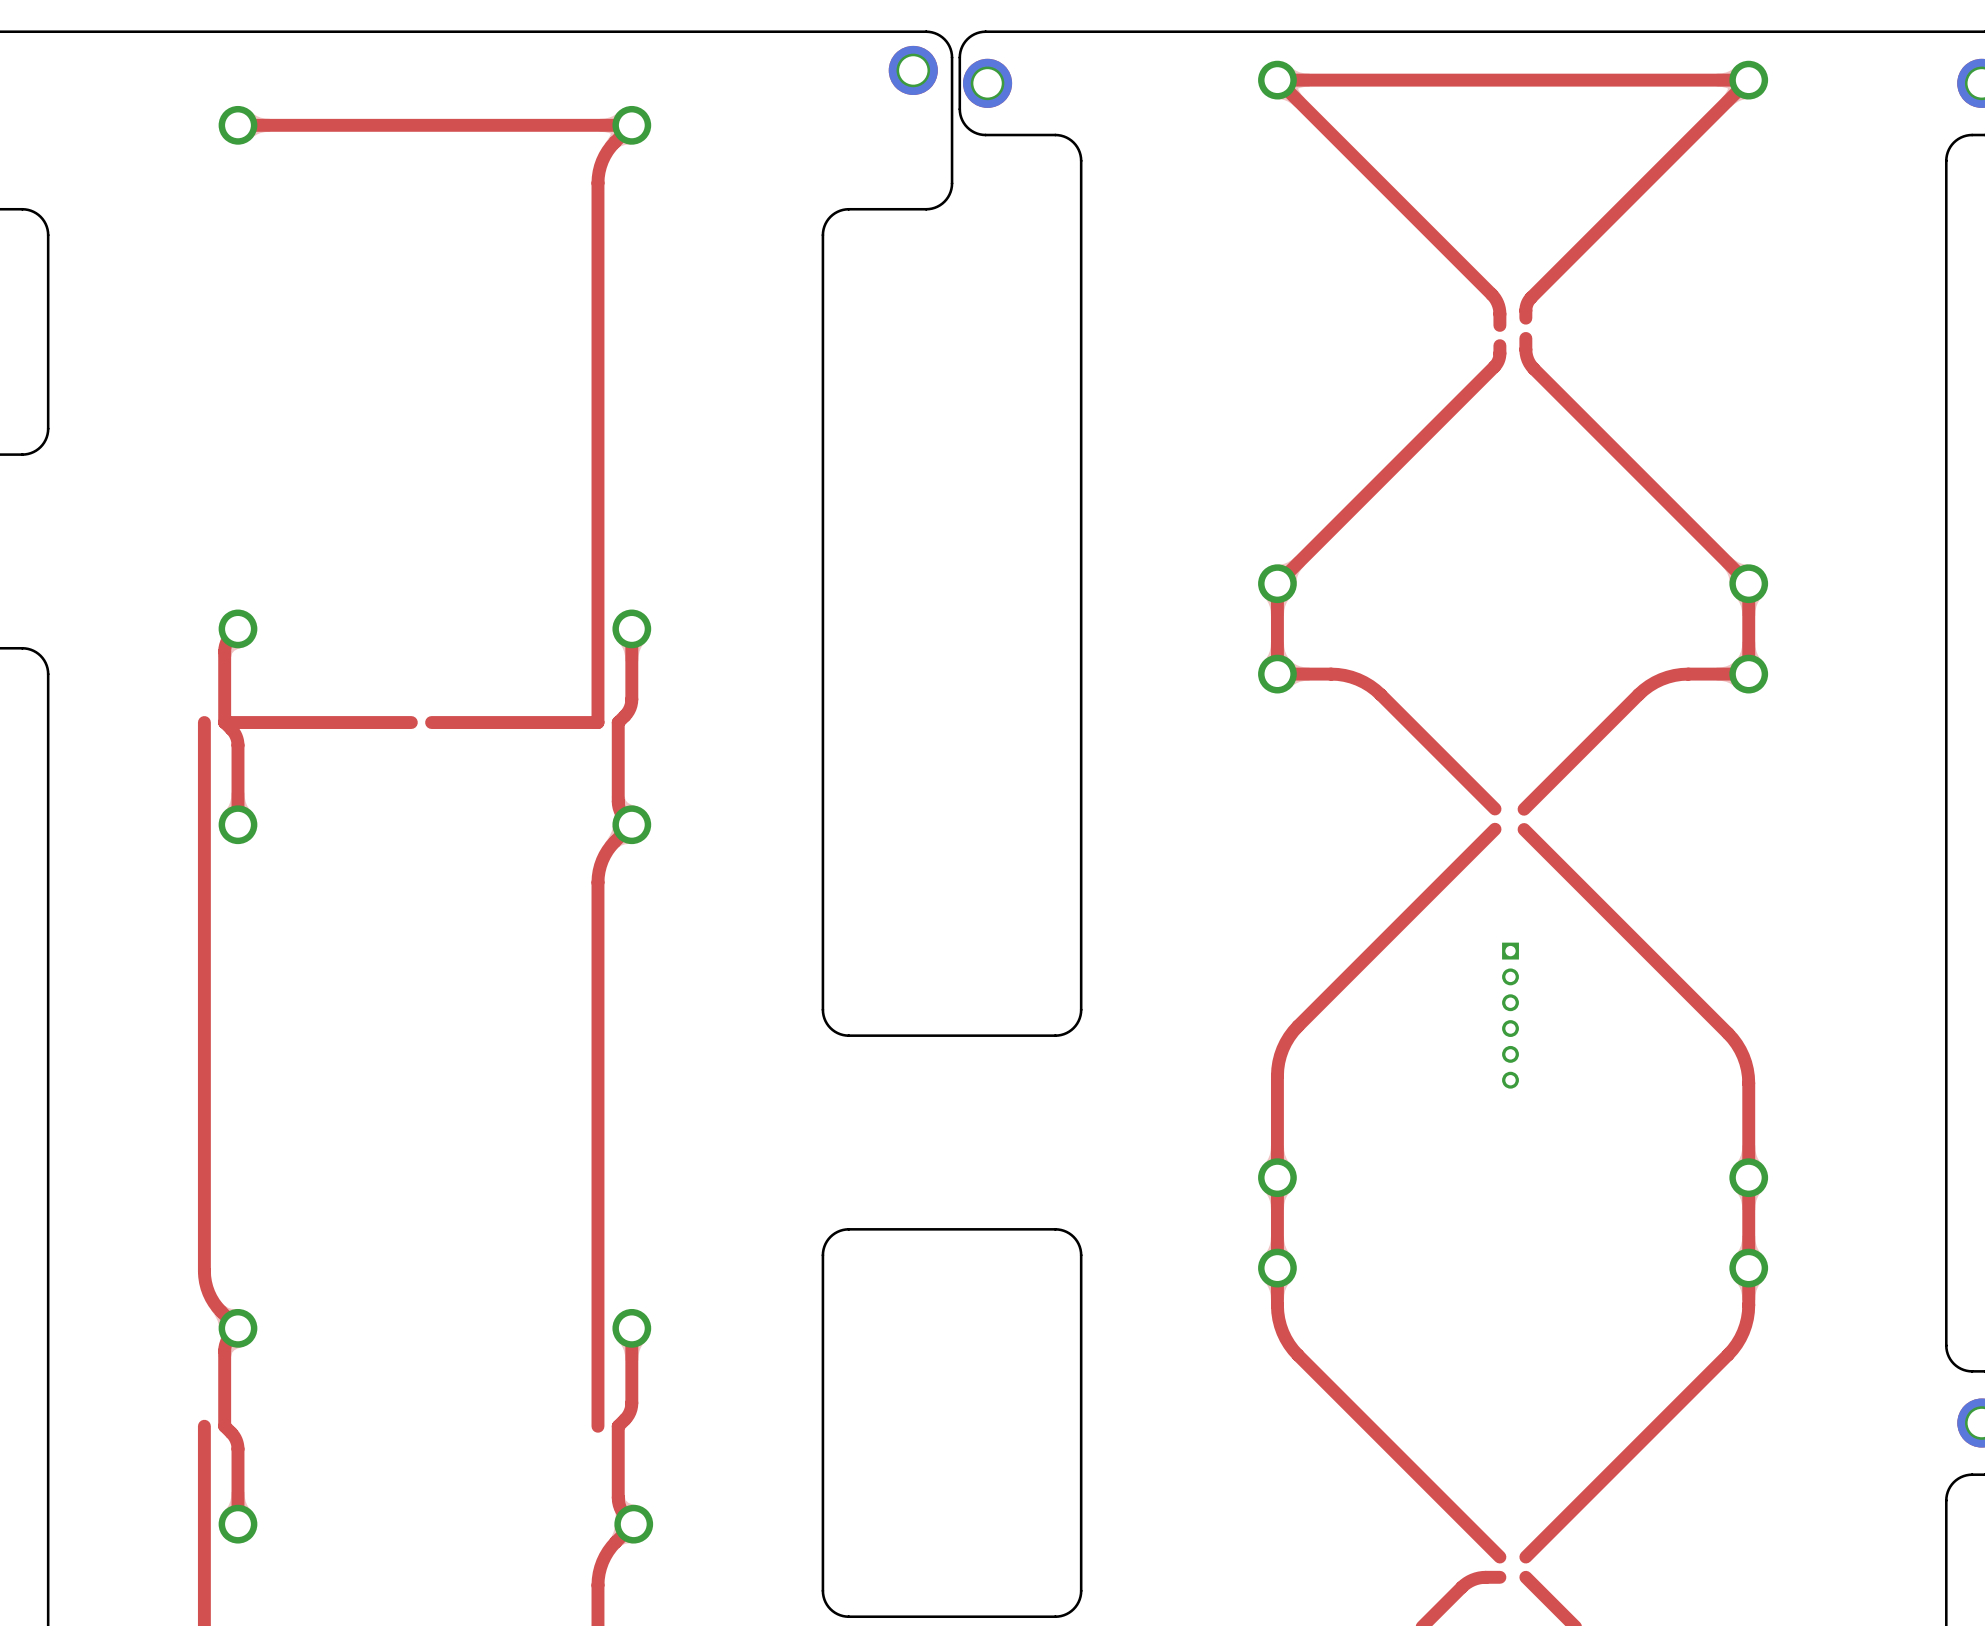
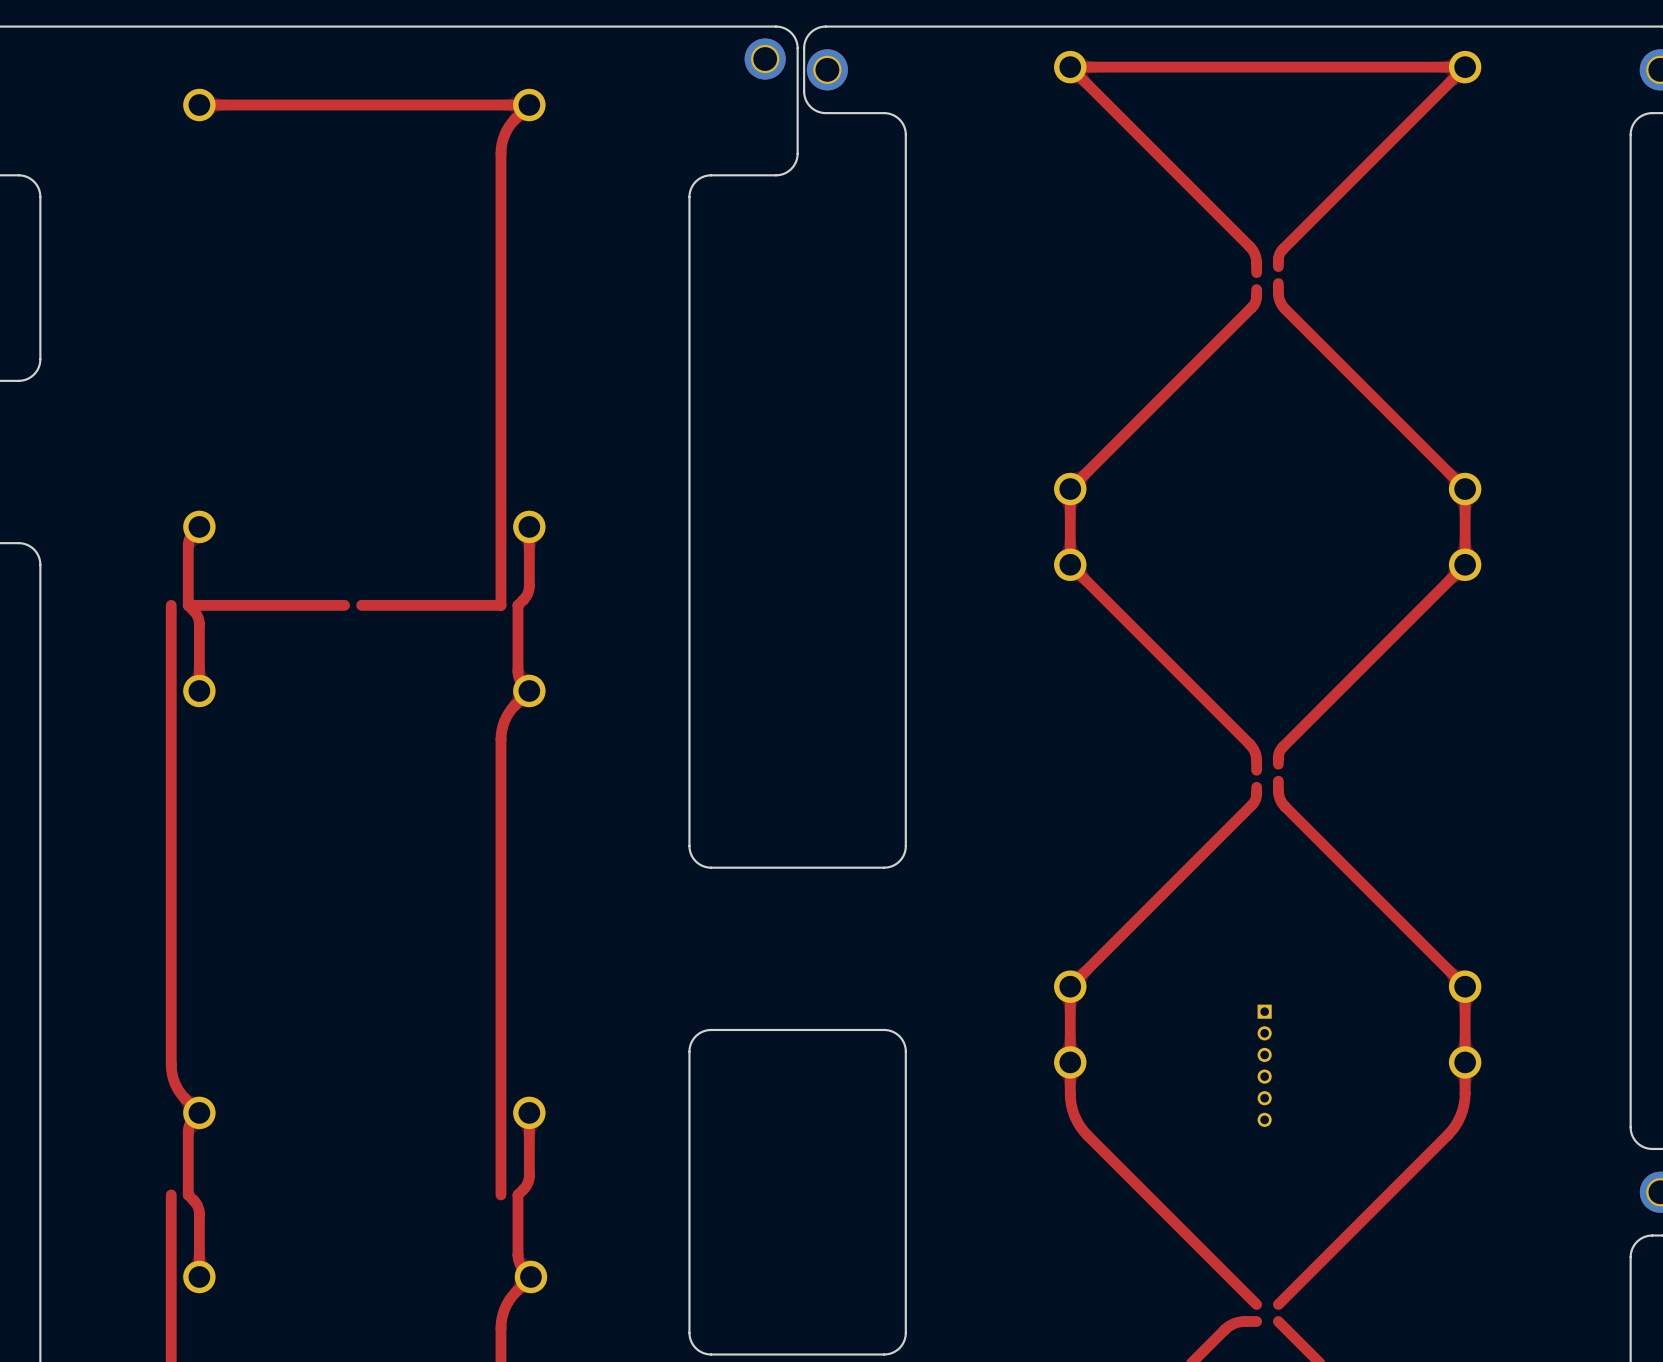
top track: (1277, 674) (1337, 674) (1351, 677) (1370, 685) (1495, 808) -> (1070, 564) (1249, 744) (1255, 754) (1256, 770)
top track: (1748, 674) (1681, 674) (1661, 679) (1649, 685) (1524, 809) -> (1465, 564) (1282, 747) (1279, 753) (1278, 764)
top track: (1495, 829) (1289, 1036) (1282, 1049) (1277, 1069) (1277, 1177) -> (1256, 787) (1255, 798) (1252, 804) (1070, 986)
top track: (1524, 829) (1736, 1044) (1745, 1062) (1748, 1076) (1748, 1177) -> (1278, 781) (1279, 796) (1285, 806) (1465, 986)
part position: (1510, 1015) -> (1264, 1065)

